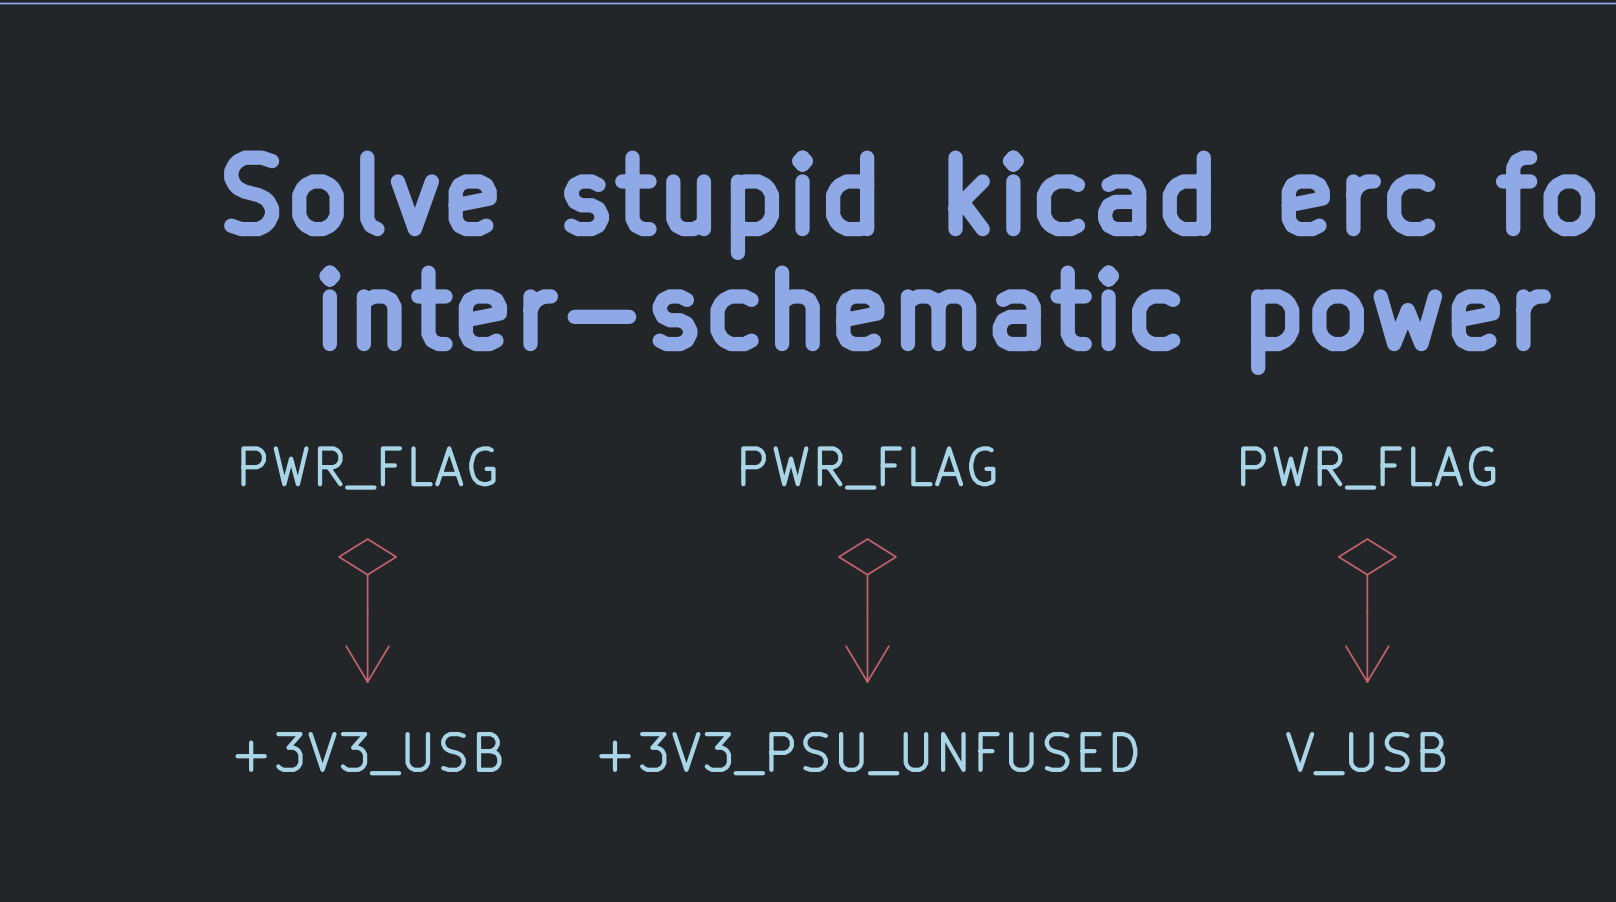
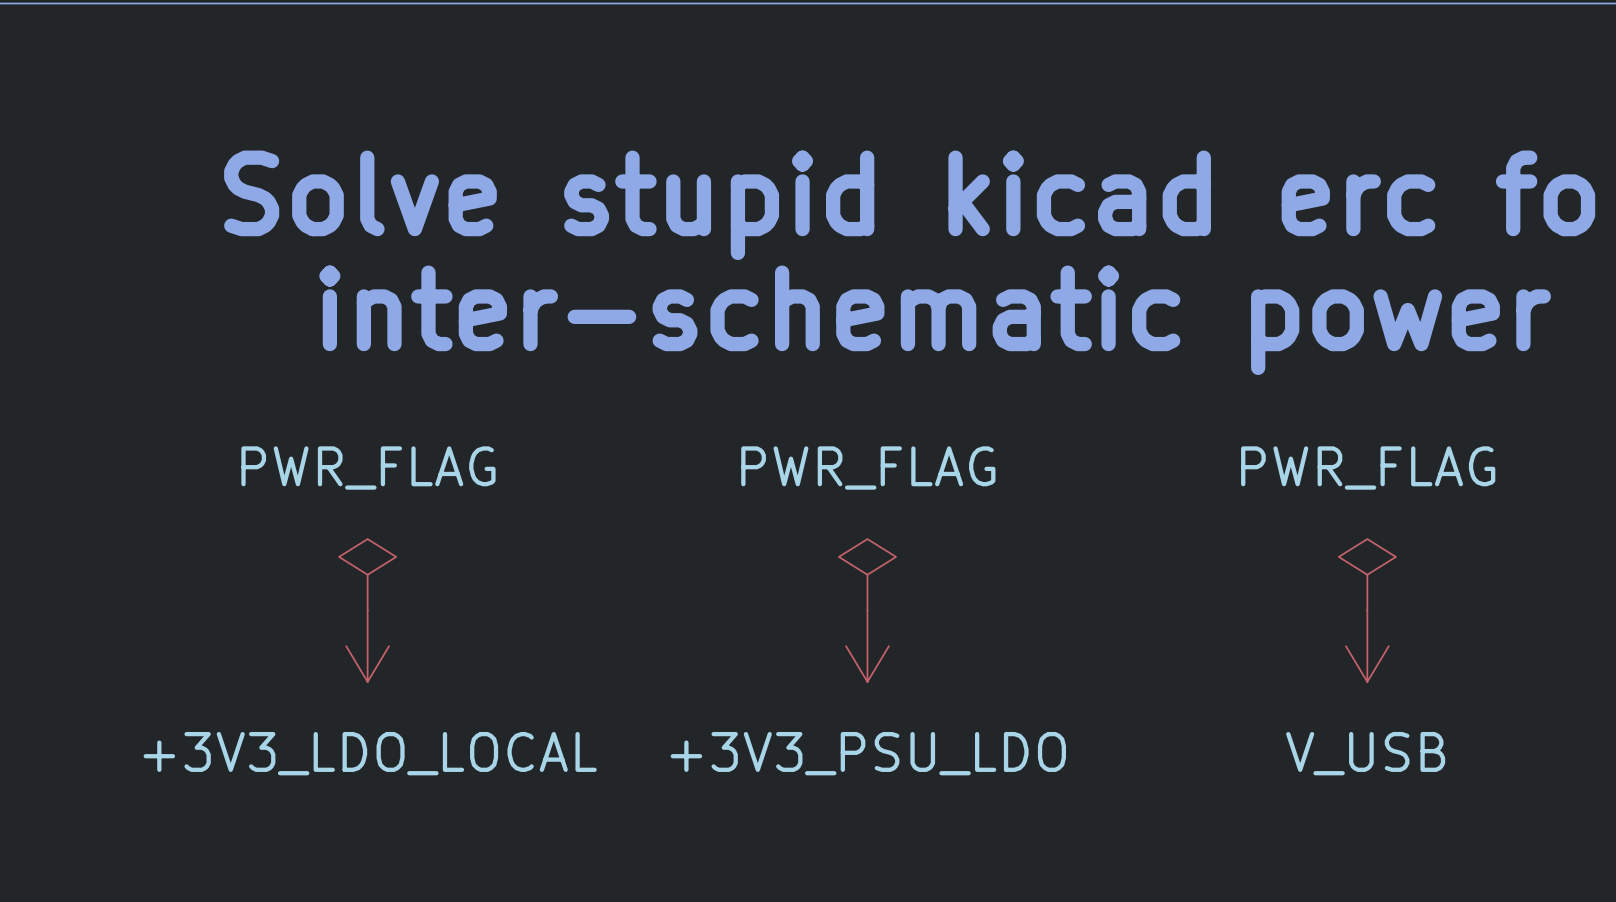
power symbol: +3V3_USB (367, 646) -> +3V3_LDO_LOCAL (367, 646)
power symbol: +3V3_PSU_UNFUSED (867, 646) -> +3V3_PSU_LDO (867, 646)

